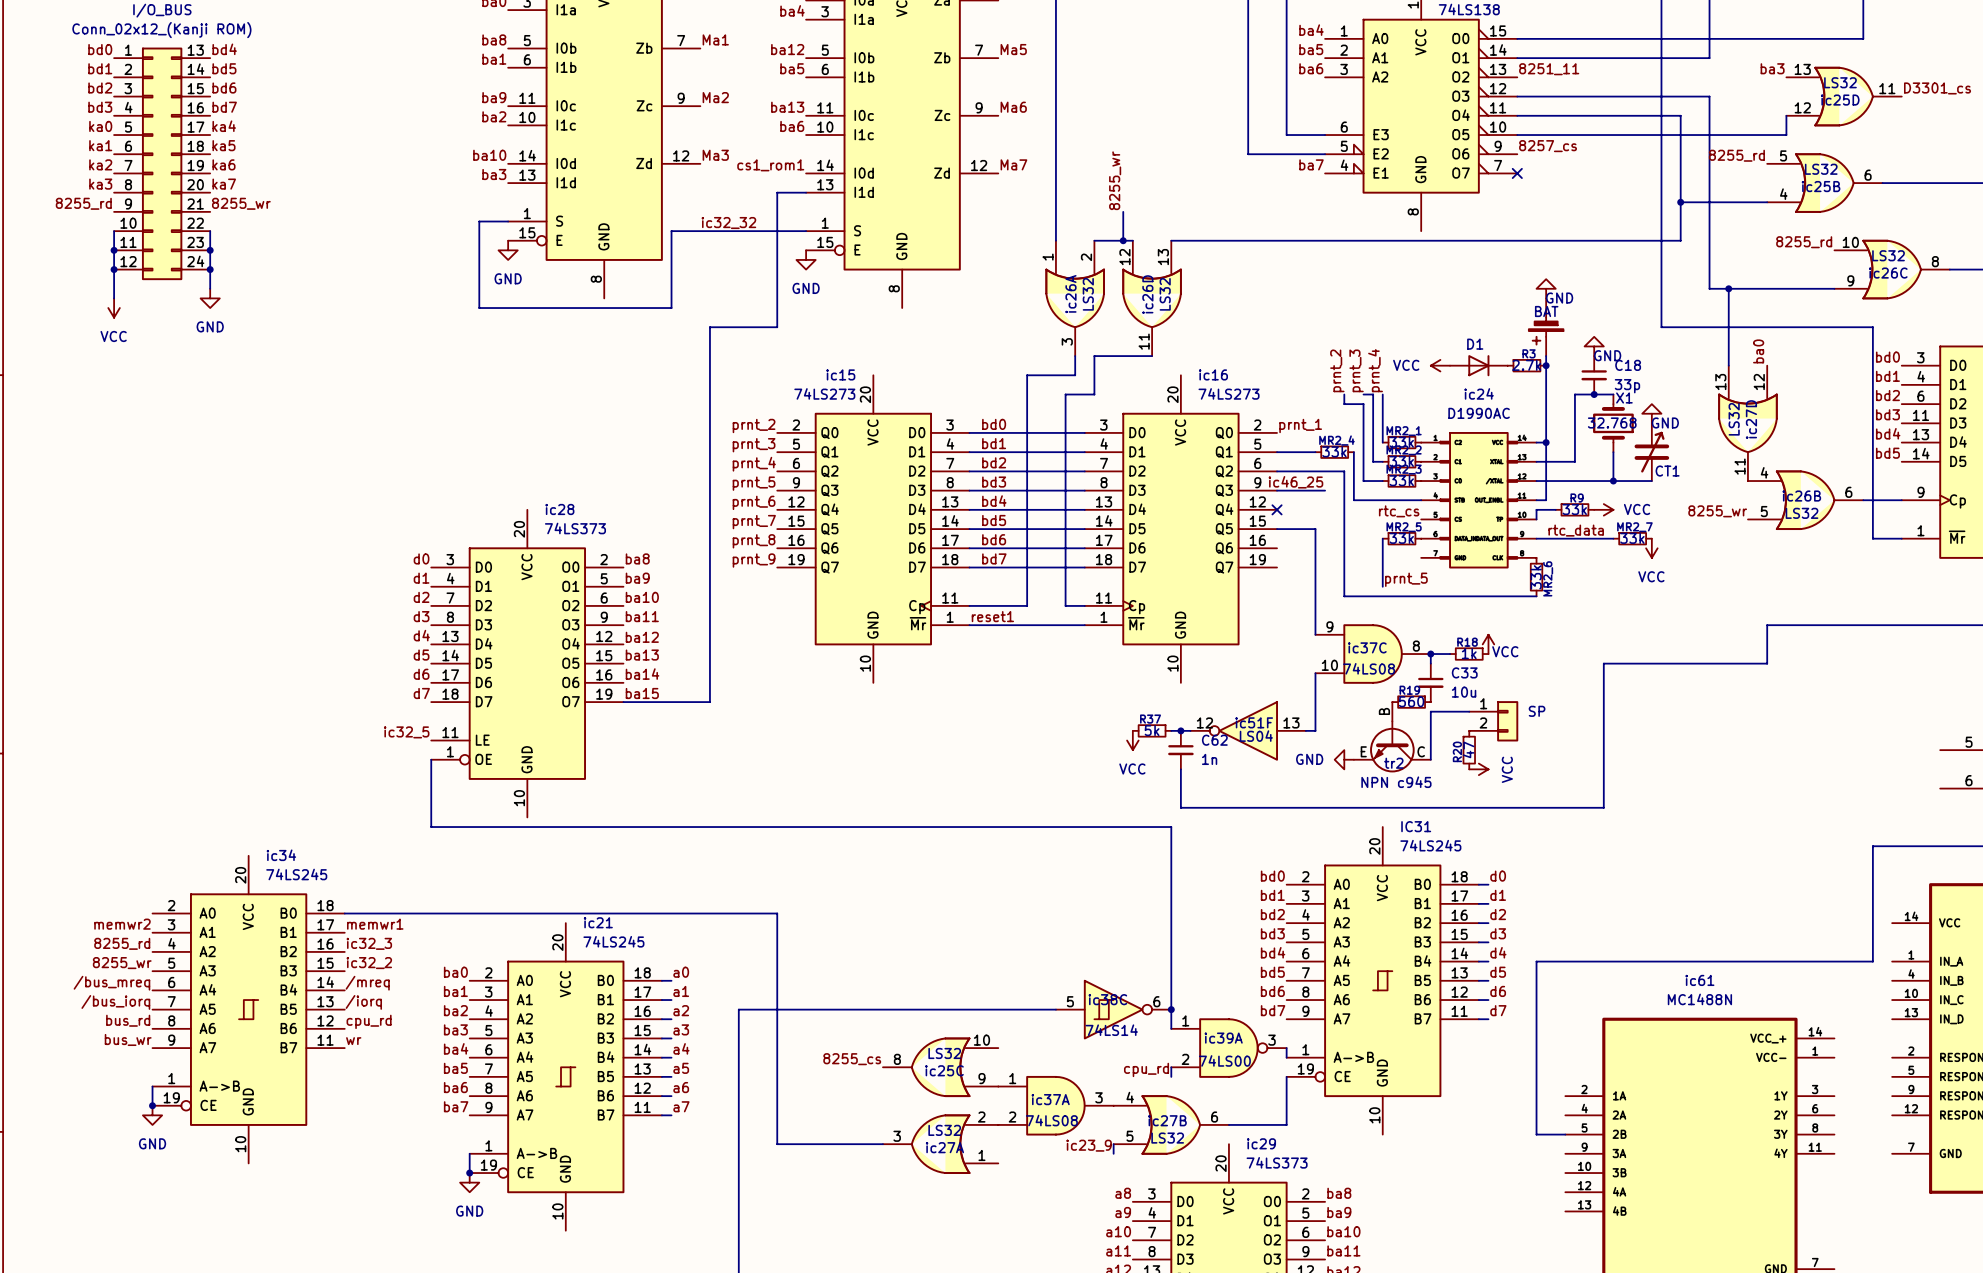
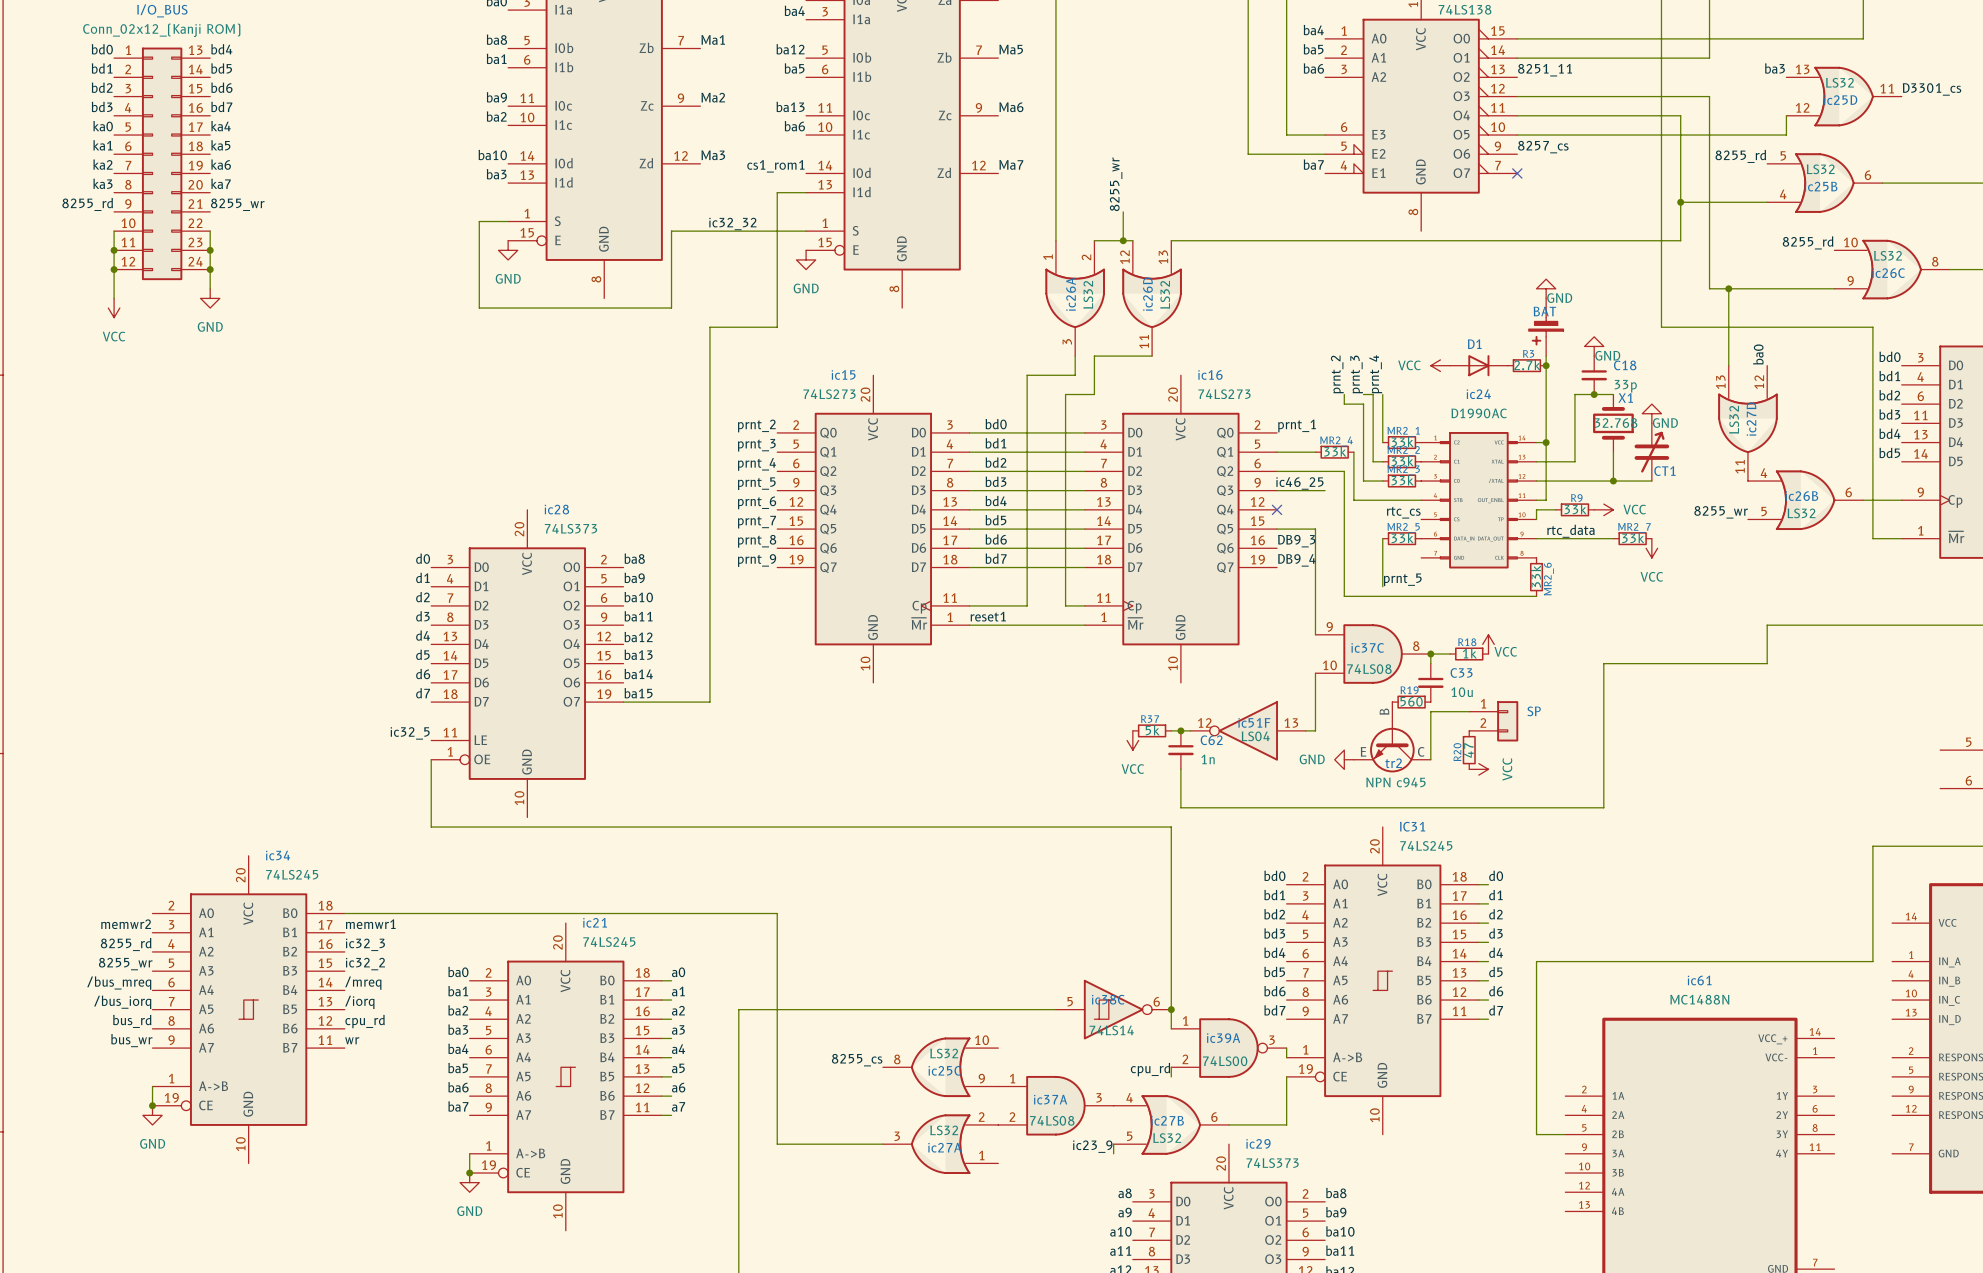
label: none -> DB9_3 (1296, 541)
label: none -> DB9_4 (1296, 560)

